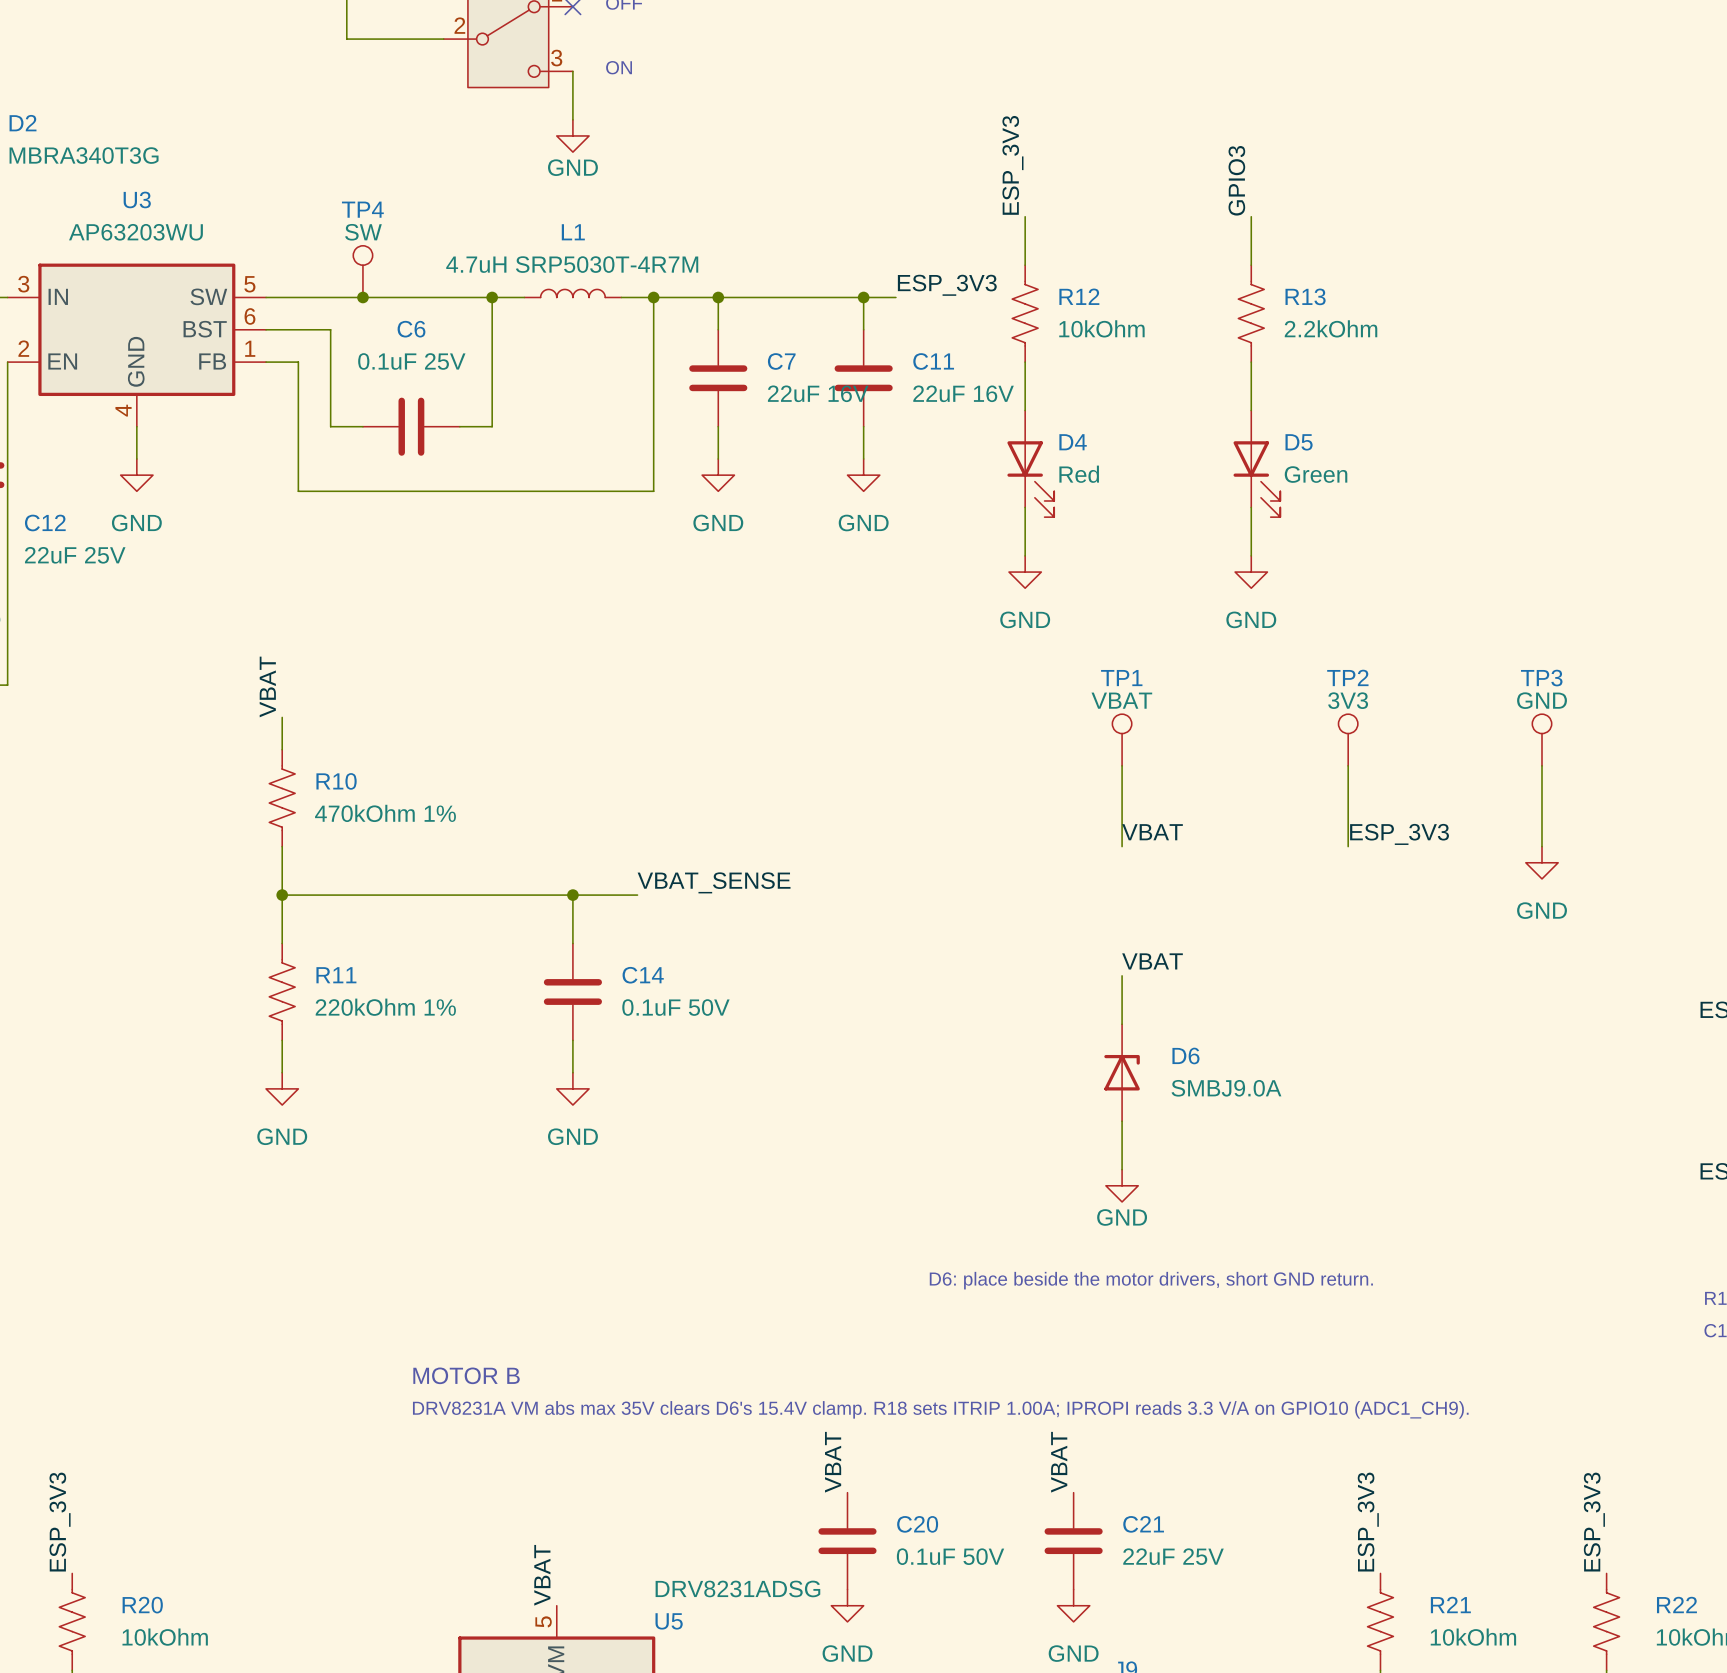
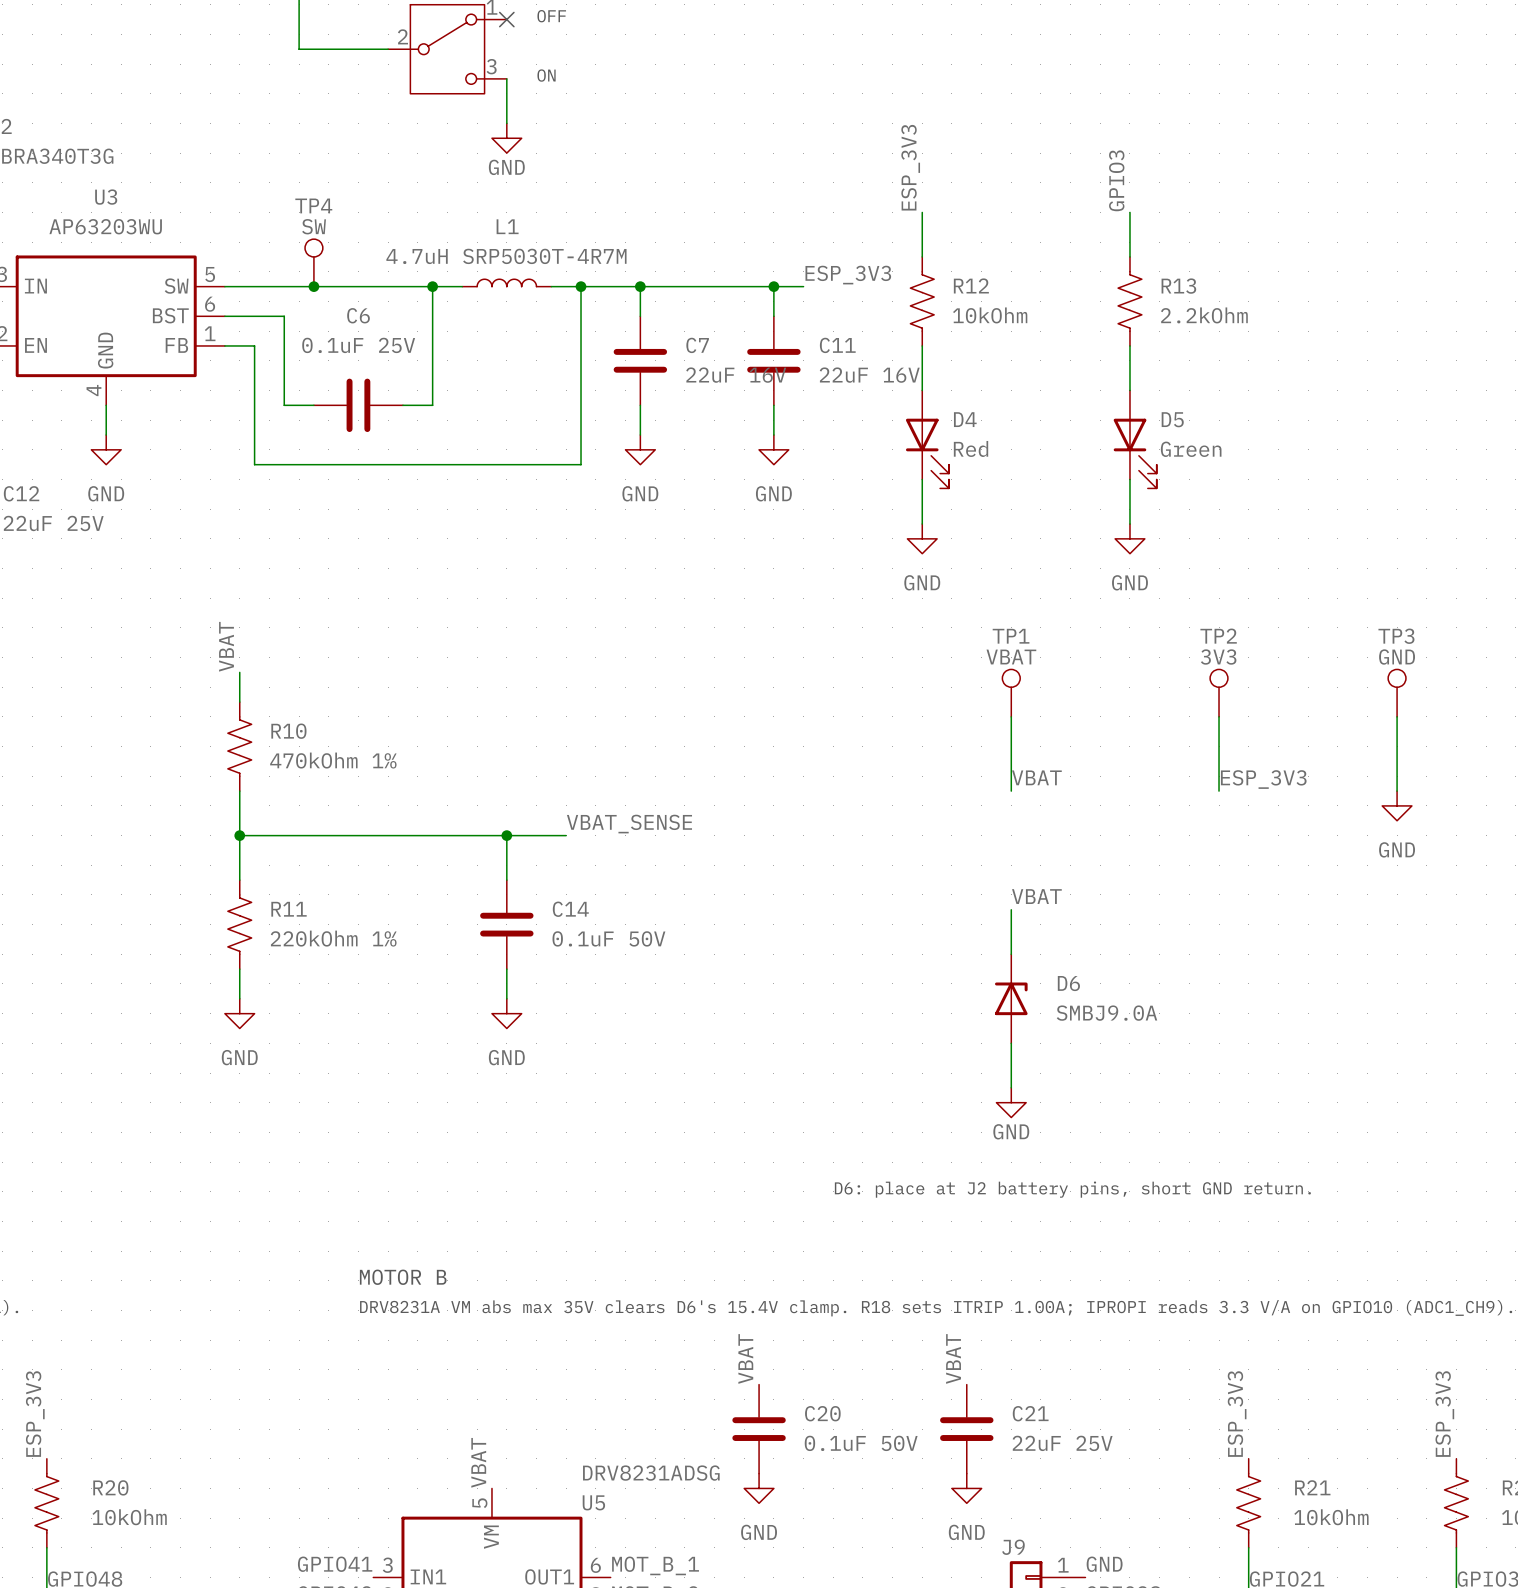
text: D6: place beside the motor drivers, short GND return. (1151, 1280) -> D6: place at J2 battery pins, short GND return. (1072, 1189)

